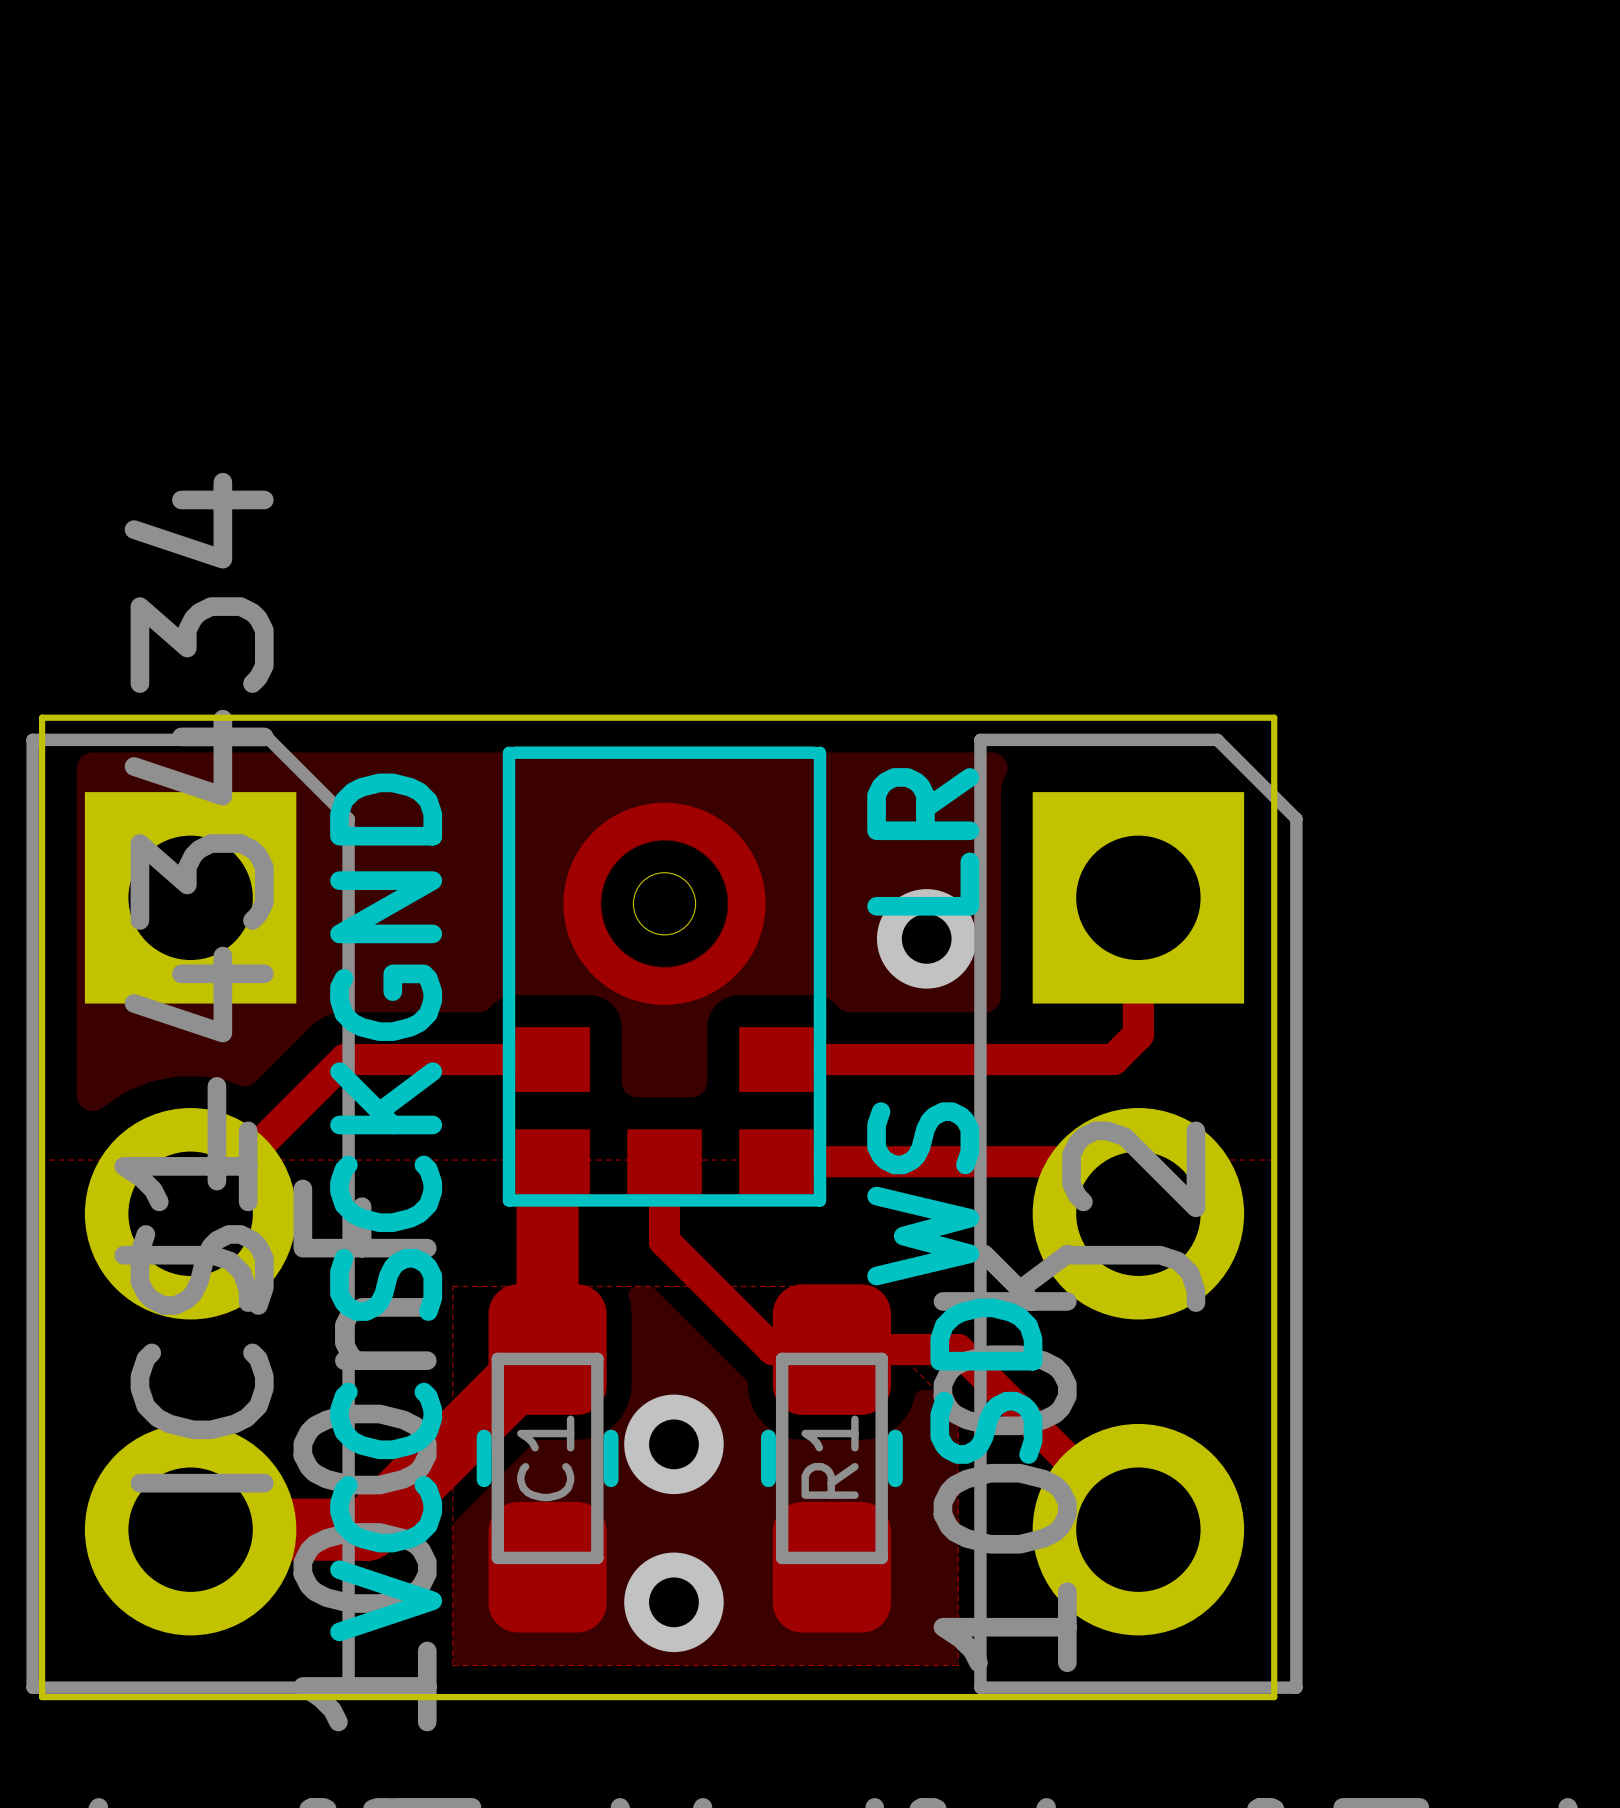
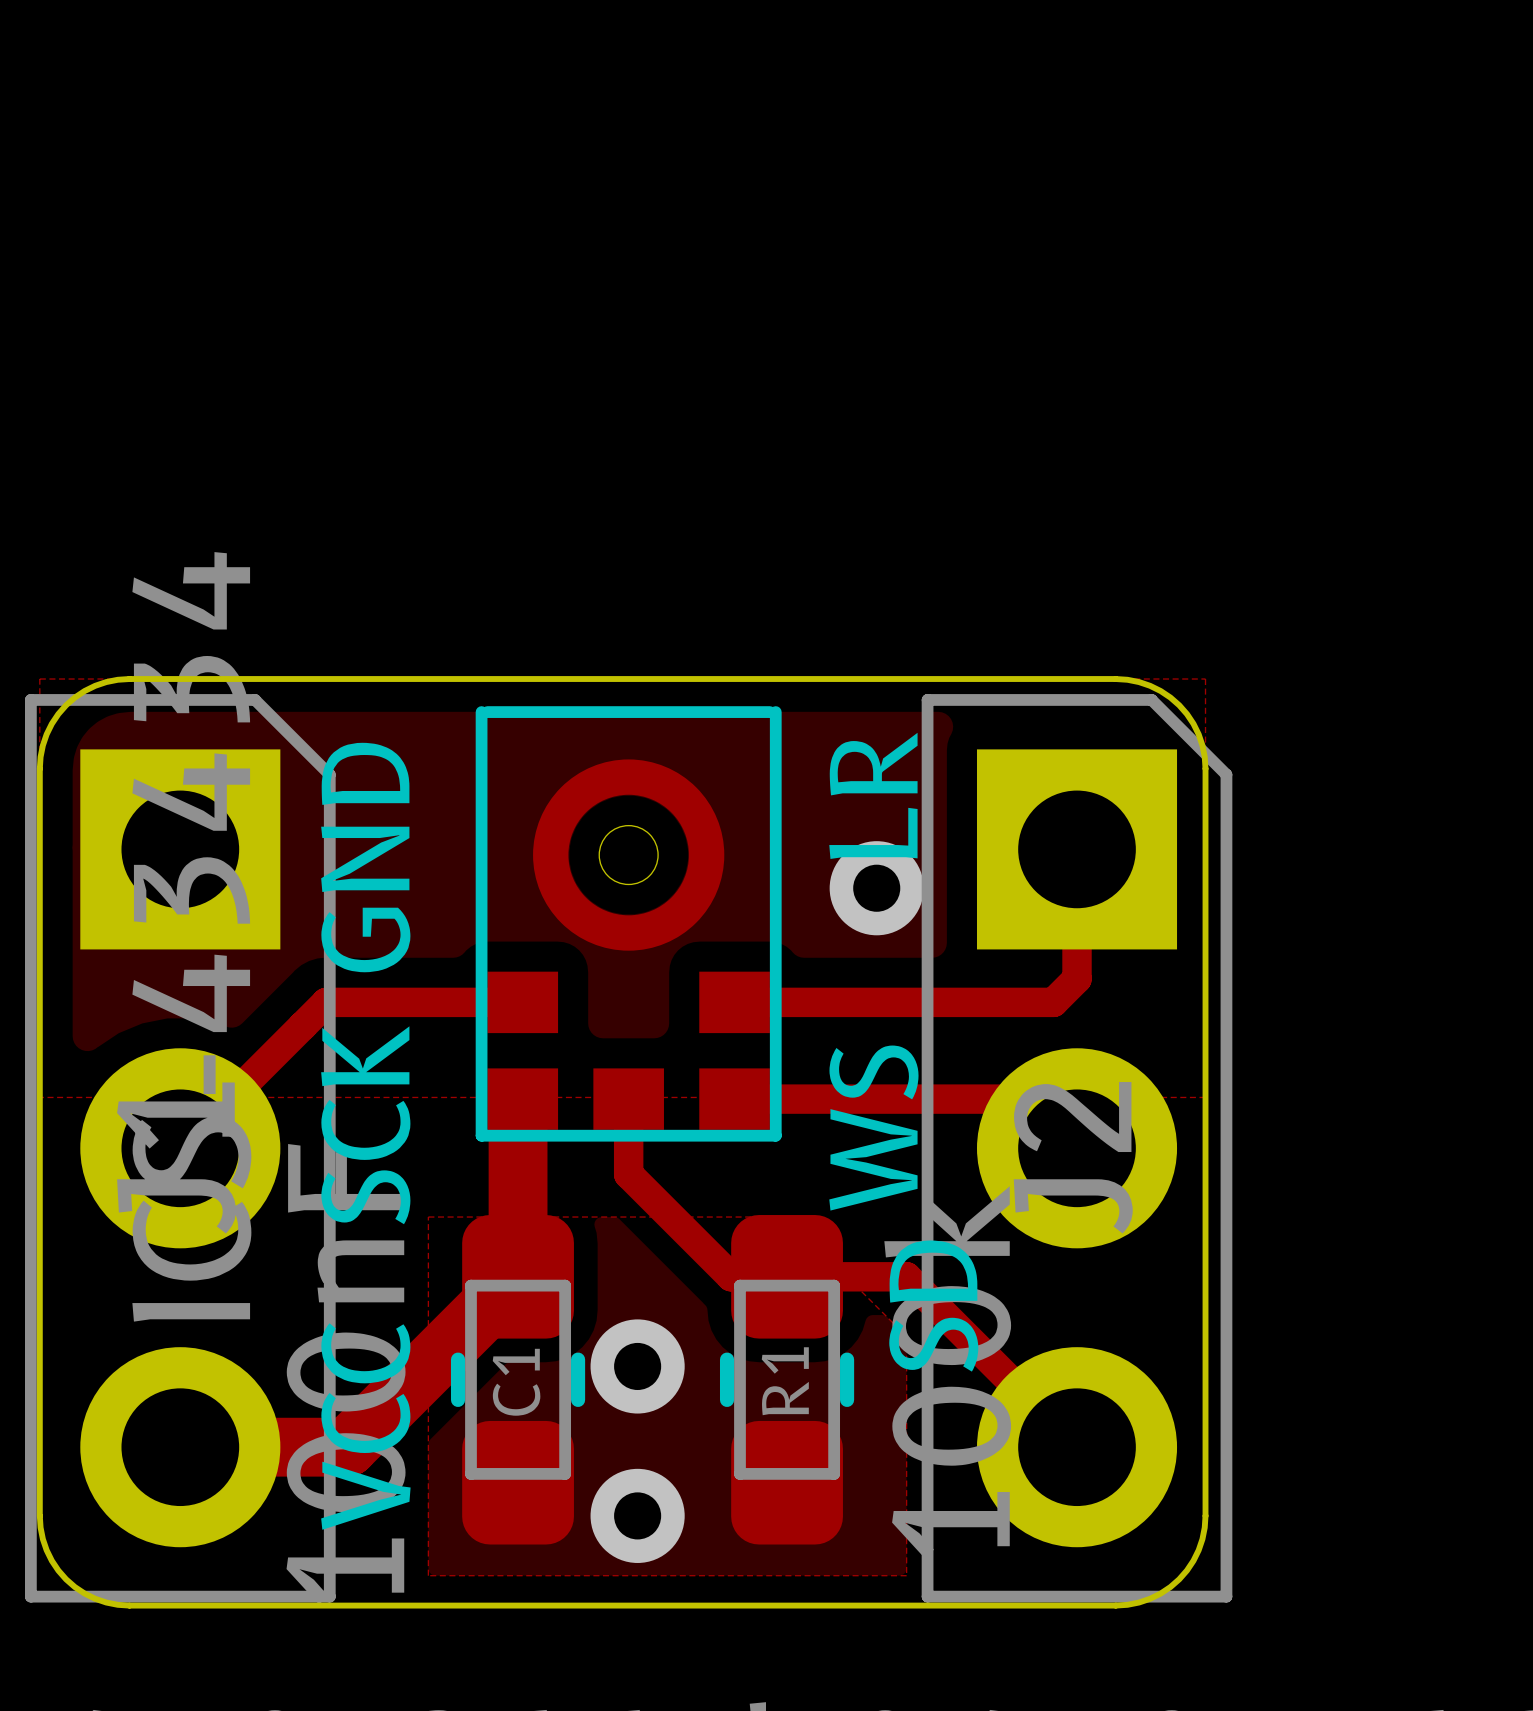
board edge: (136, 717) (42, 717) (42, 812) -> (129, 679) (117, 679) (95, 685) (74, 697) (66, 705) (51, 723) (46, 734) (42, 745) (39, 768)
board edge: (1179, 717) (1274, 717) (1274, 812) -> (1115, 679) (1127, 679) (1150, 685) (1170, 697) (1179, 705) (1186, 714) (1198, 734) (1204, 756) (1205, 768)
board edge: (42, 1602) (42, 1697) (136, 1697) -> (39, 1515) (40, 1527) (46, 1550) (58, 1570) (66, 1579) (74, 1587) (95, 1598) (117, 1604) (129, 1605)
board edge: (1274, 1602) (1274, 1697) (1179, 1697) -> (1205, 1515) (1204, 1527) (1198, 1550) (1186, 1570) (1179, 1579) (1170, 1587) (1150, 1598) (1127, 1604) (1115, 1605)

